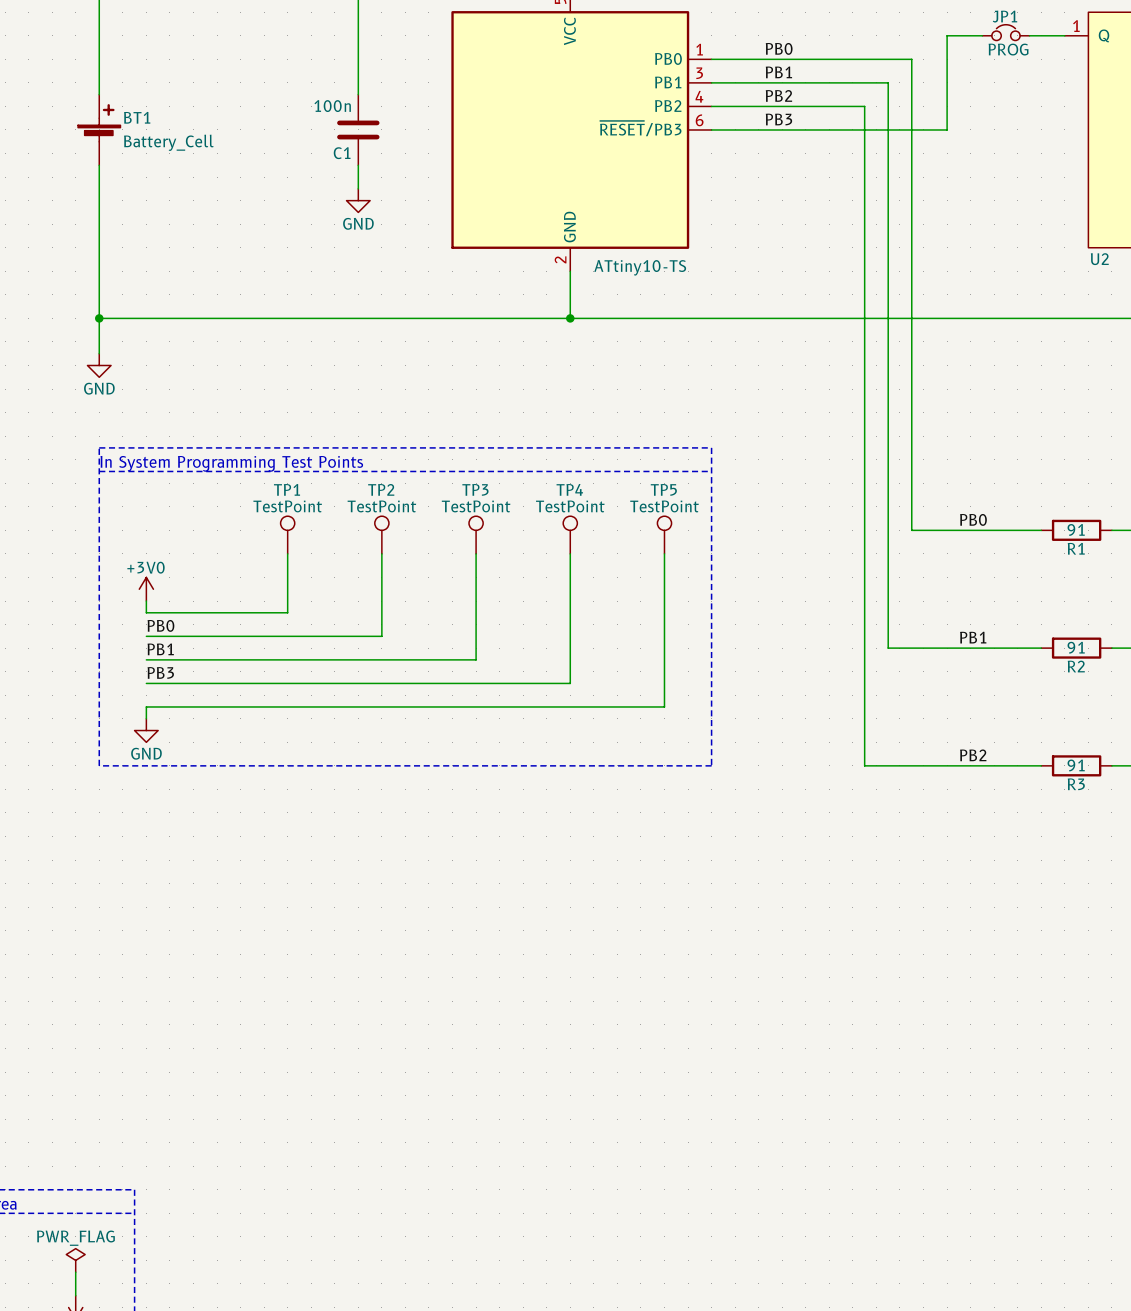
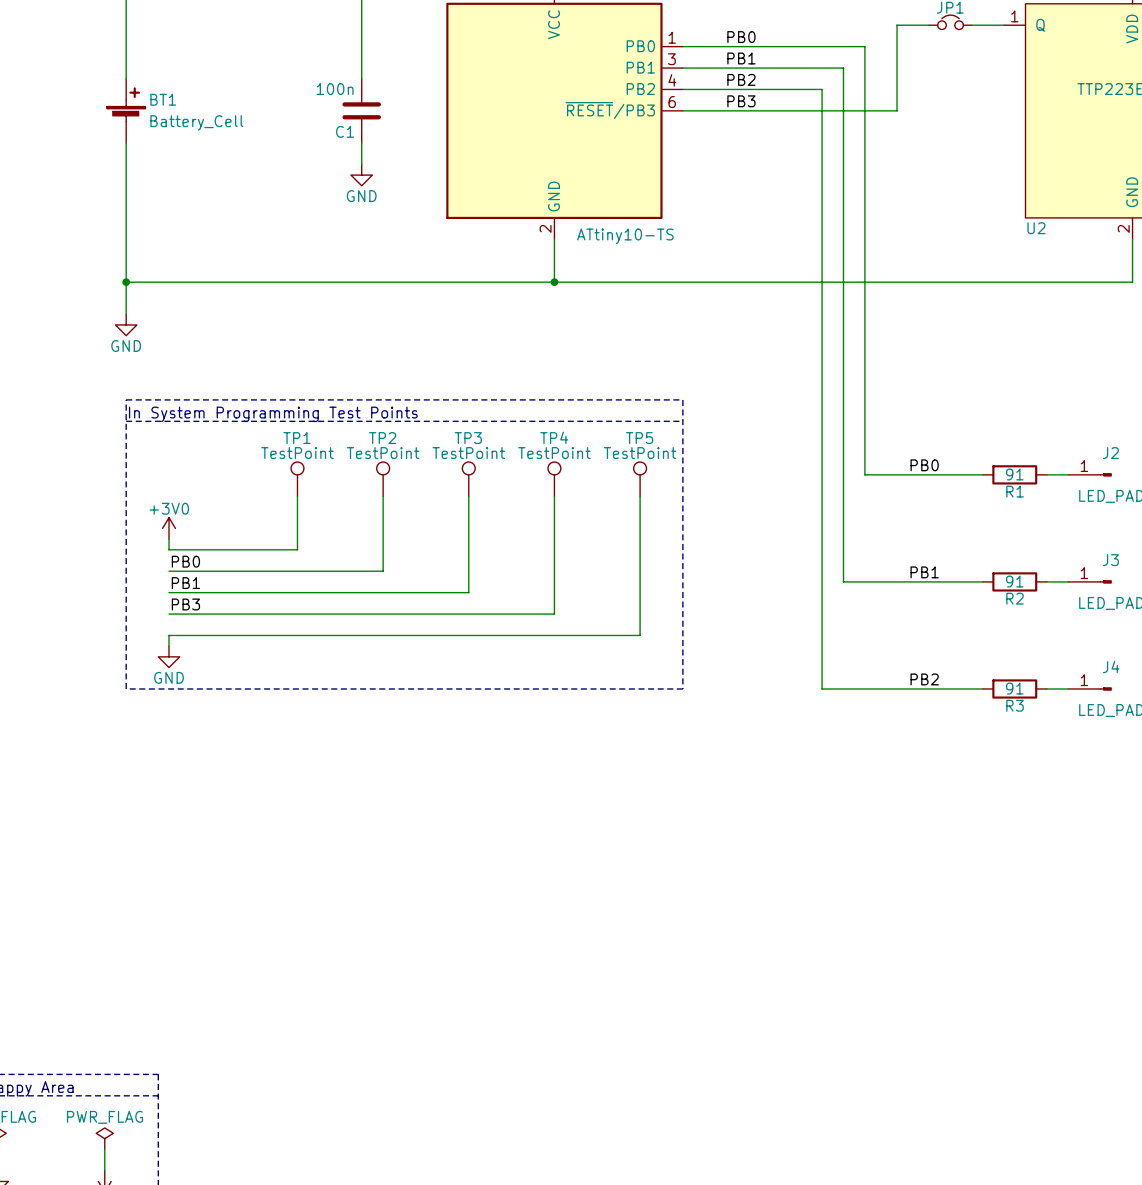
JP1 value: PROG (1008, 49) -> none

